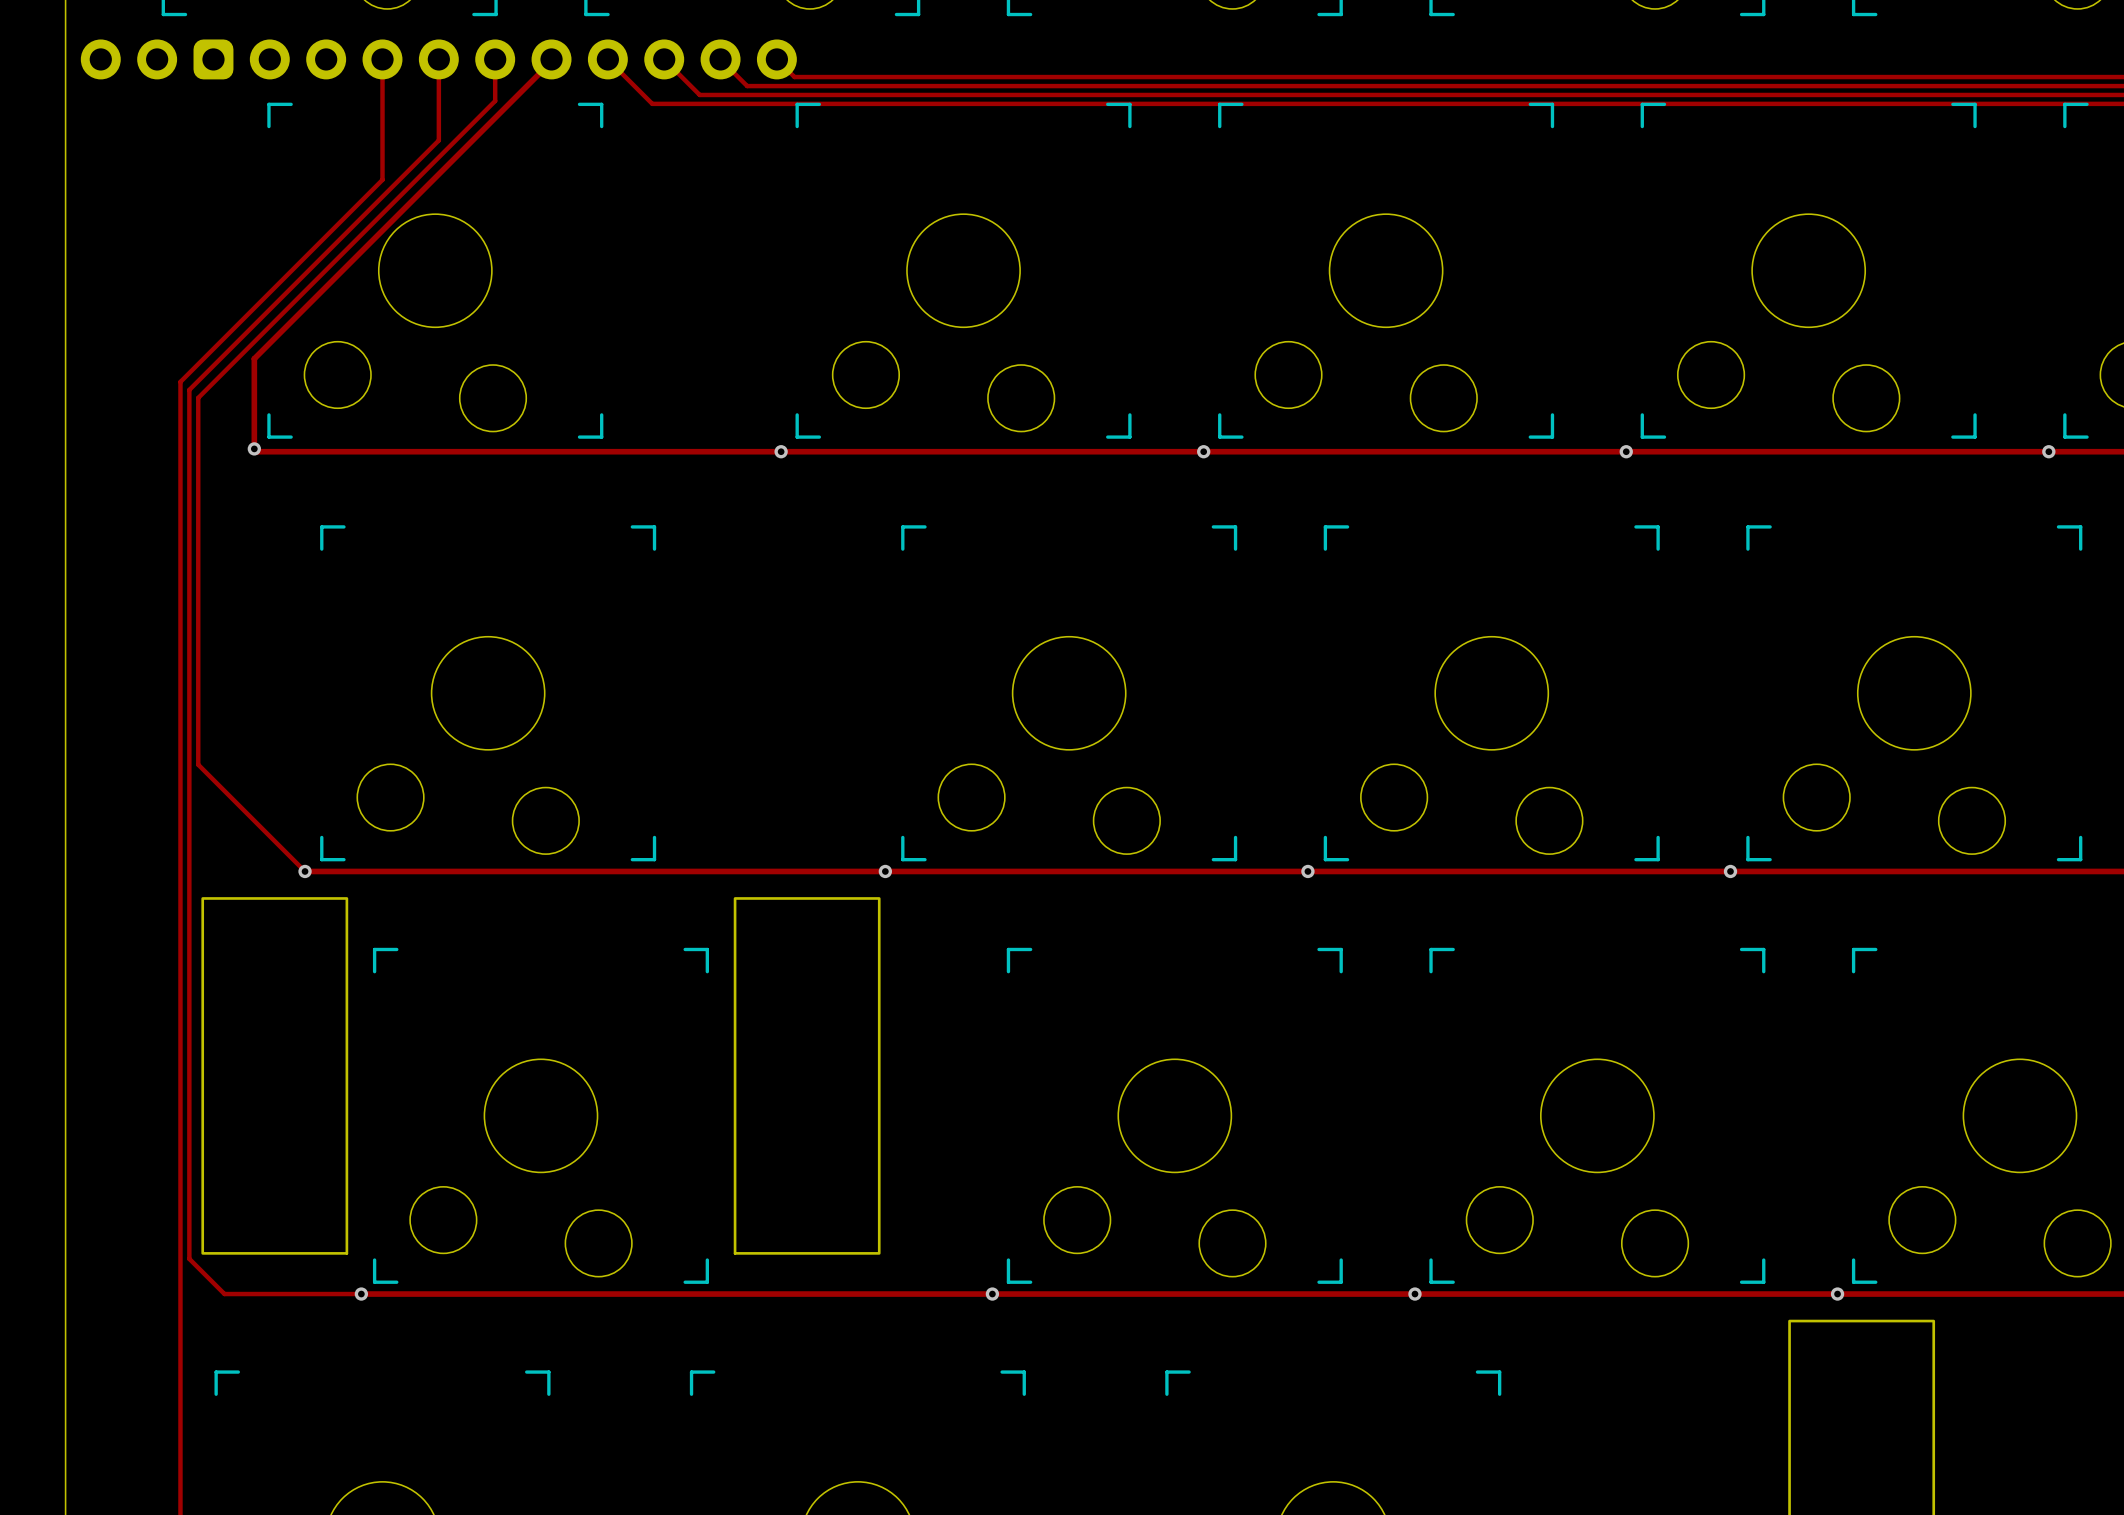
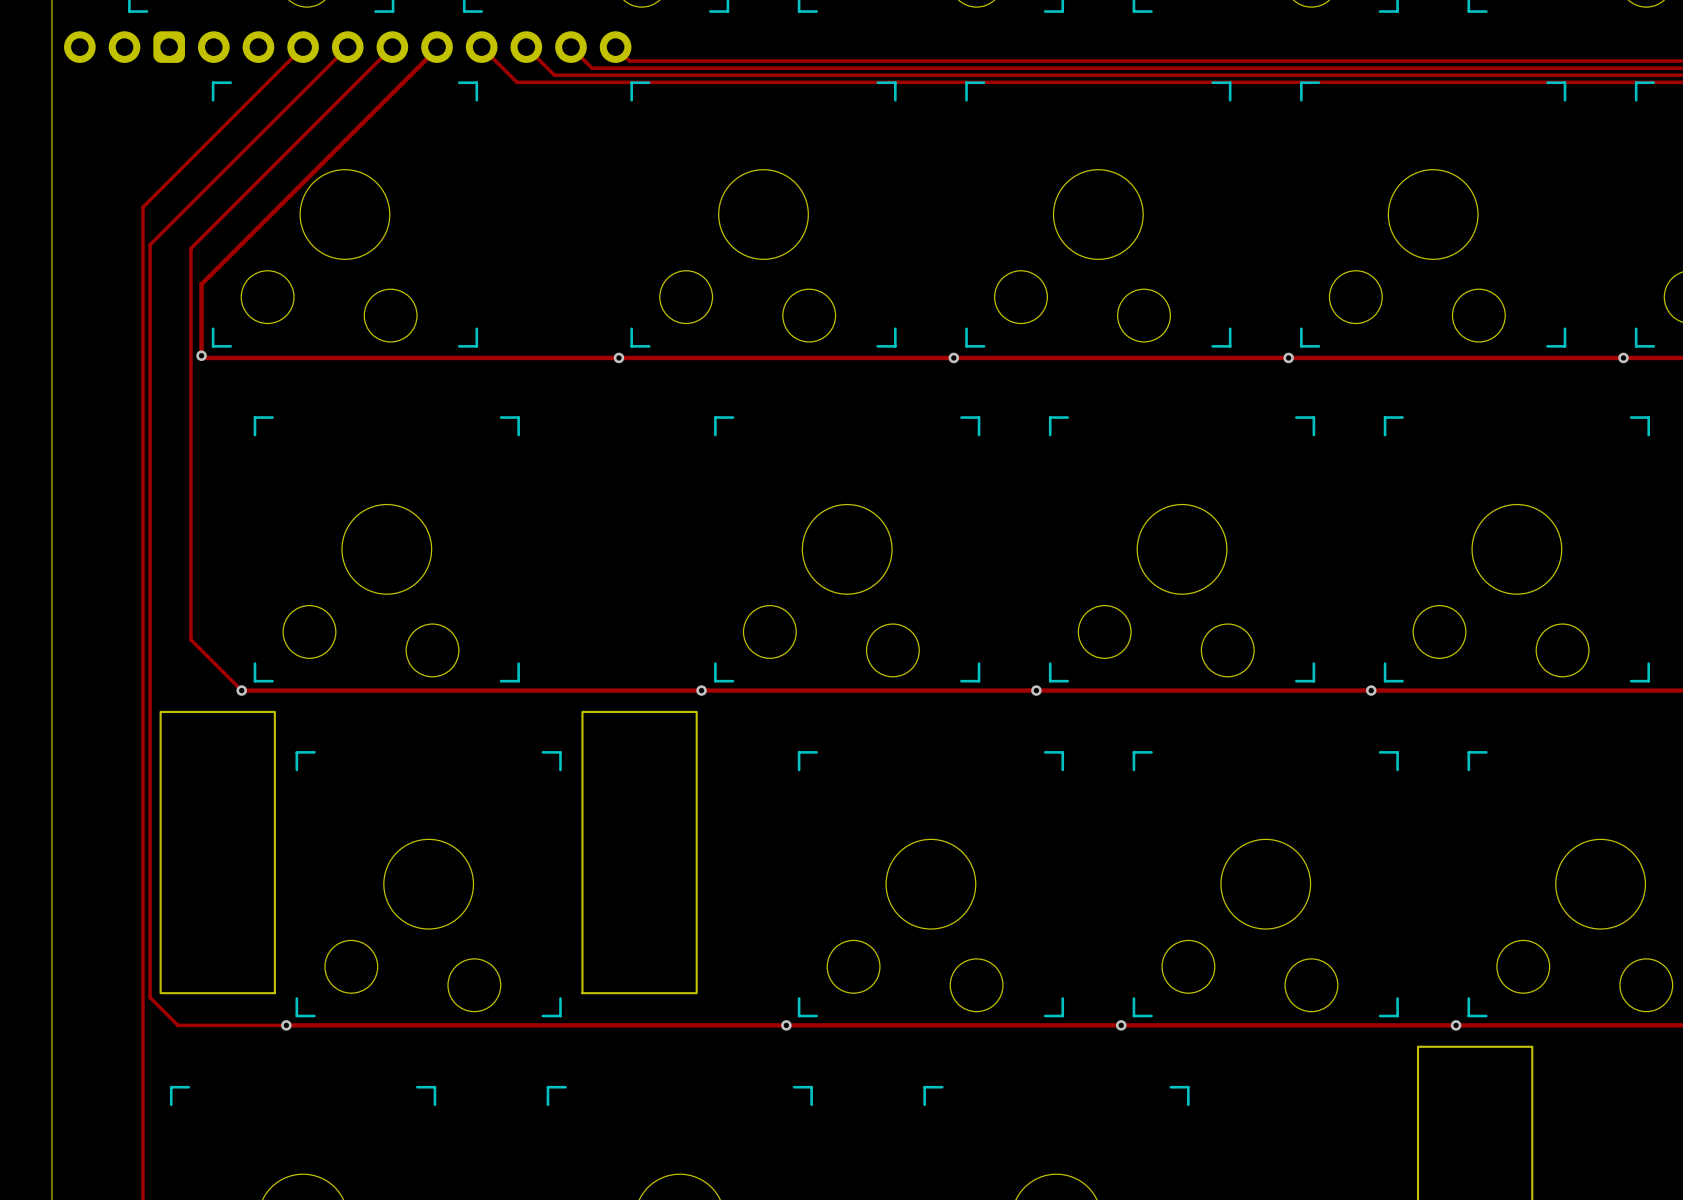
track: (382, 59) (382, 179) (180, 381) -> (303, 47) (143, 207) (143, 302)
track: (438, 59) (438, 140) (189, 389) -> (347, 47) (150, 244) (150, 308)
track: (495, 59) (495, 100) (198, 397) (198, 764) (241, 807) -> (392, 47) (190, 248) (190, 639)

